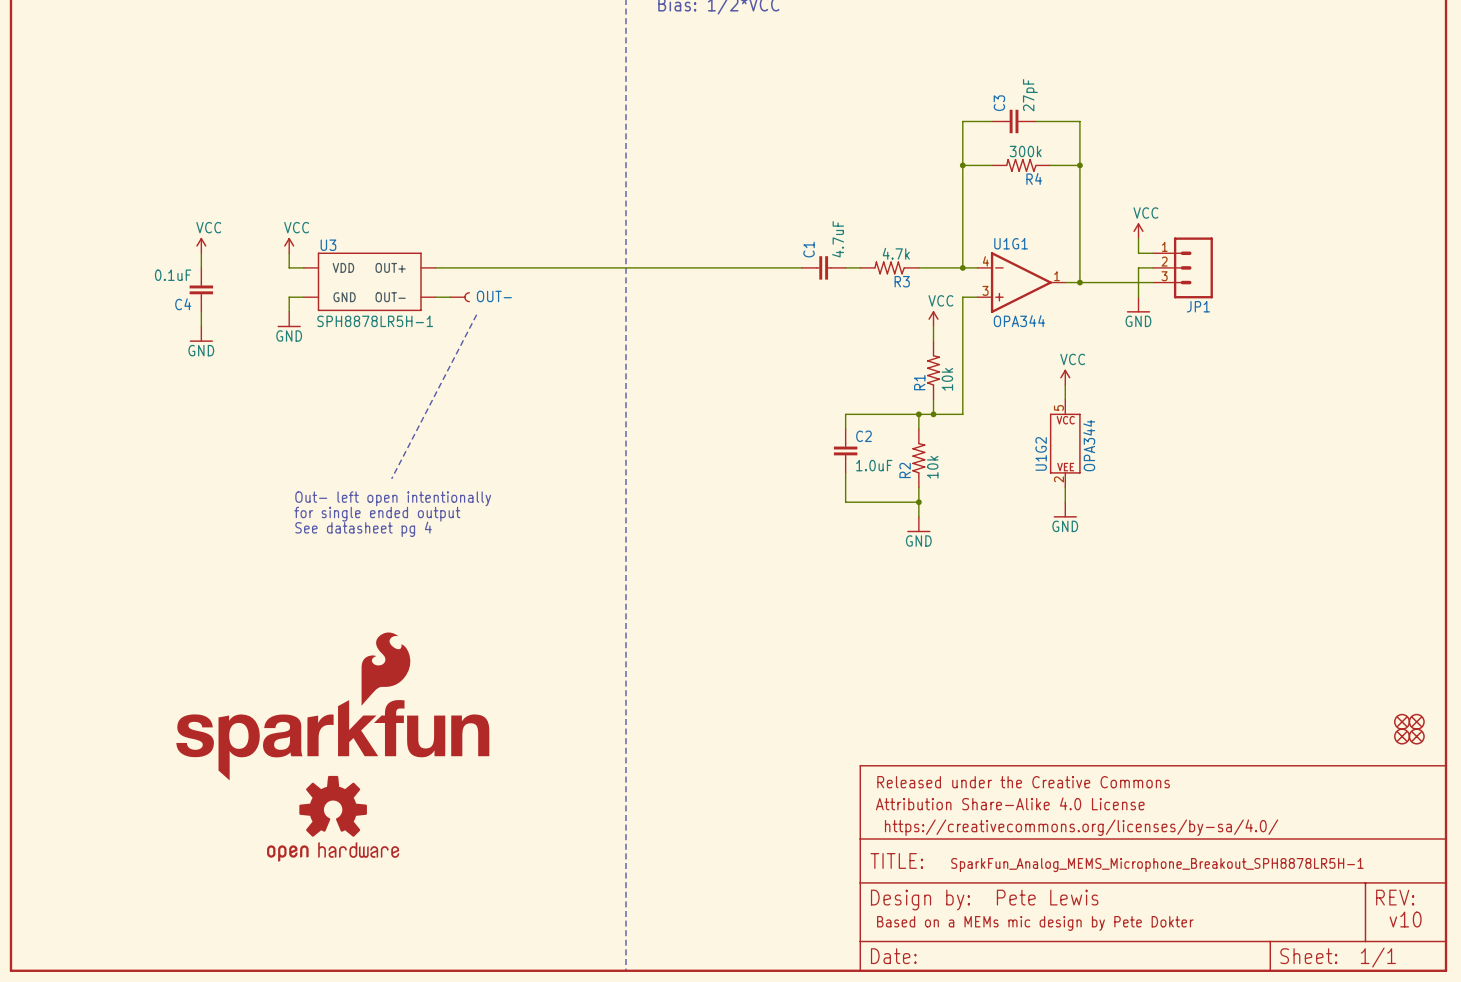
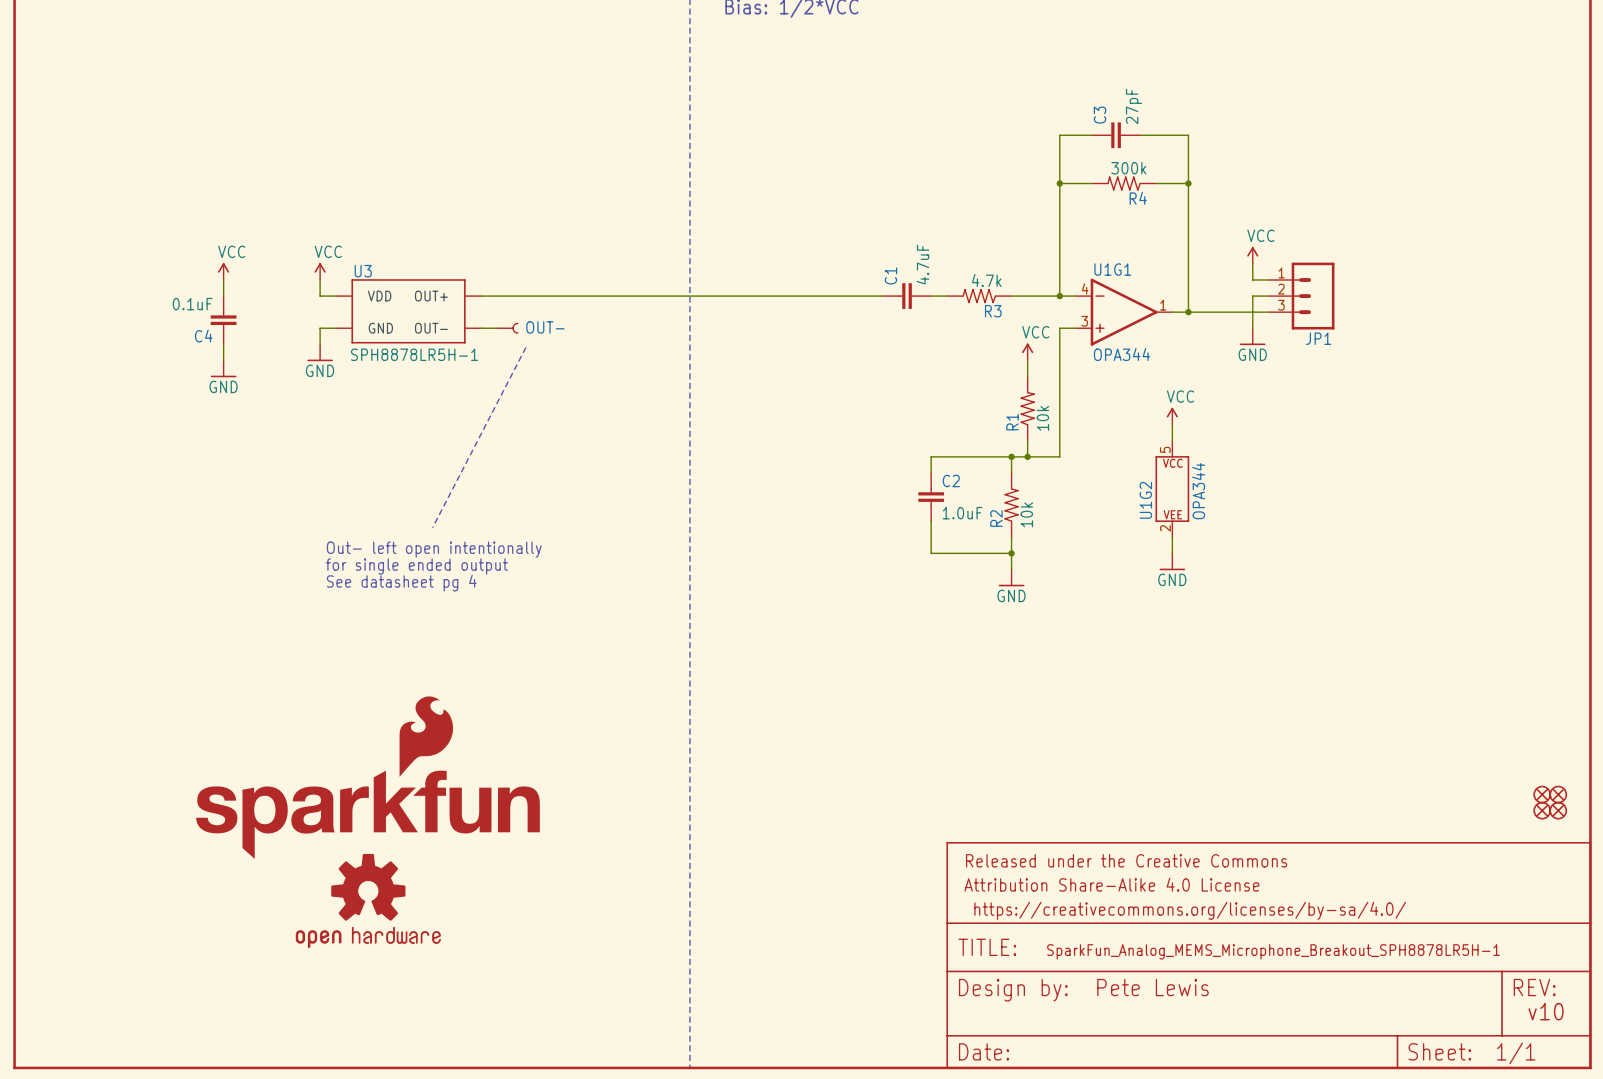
text: Based on a MEMs mic design by Pete Dokter (1035, 923) -> none

